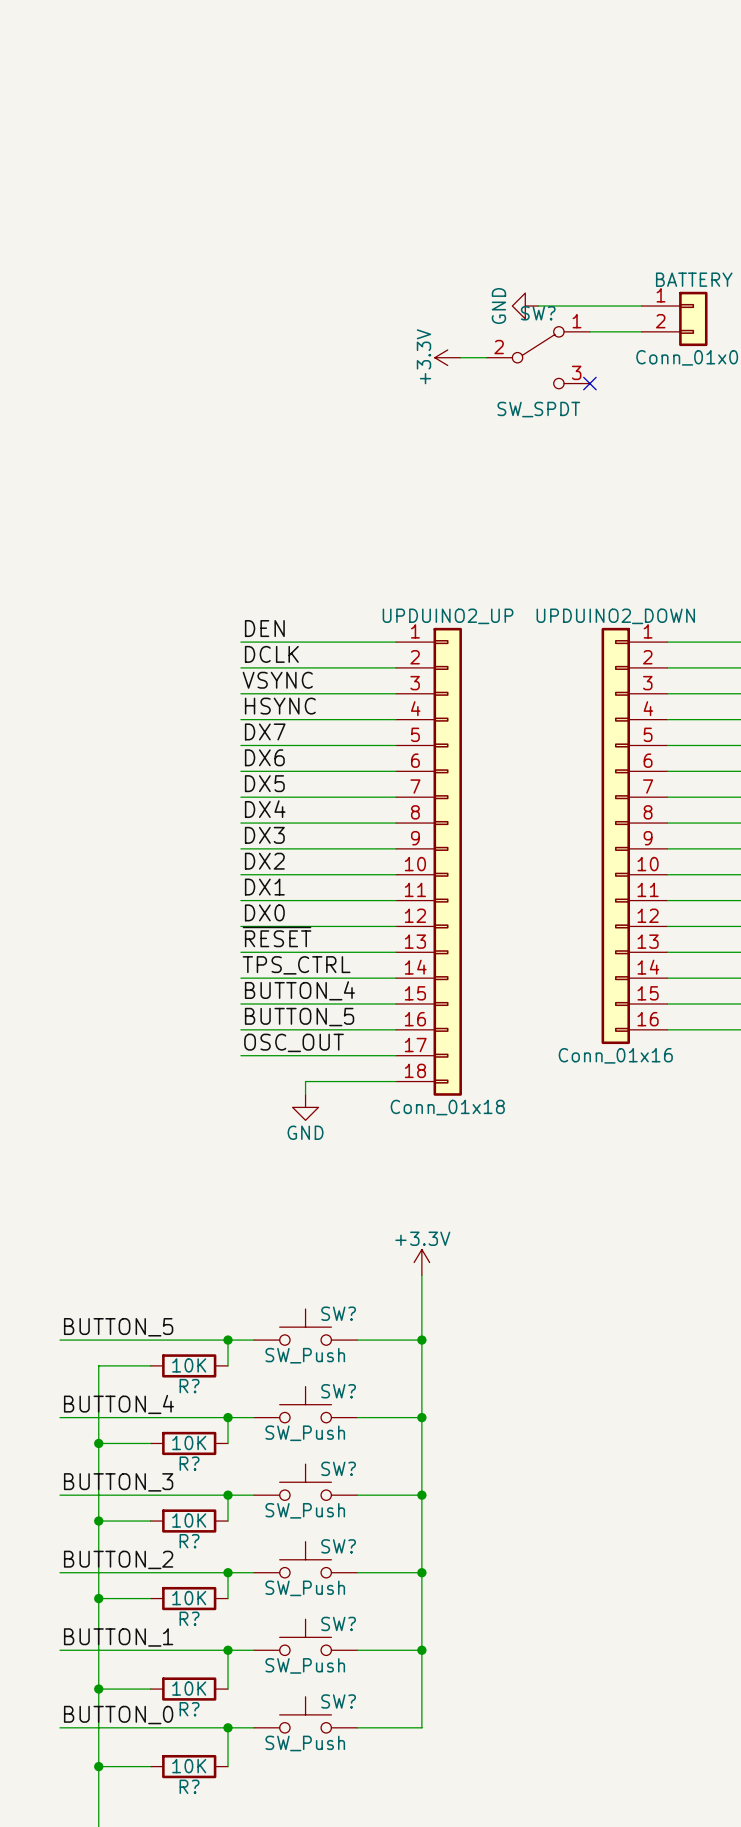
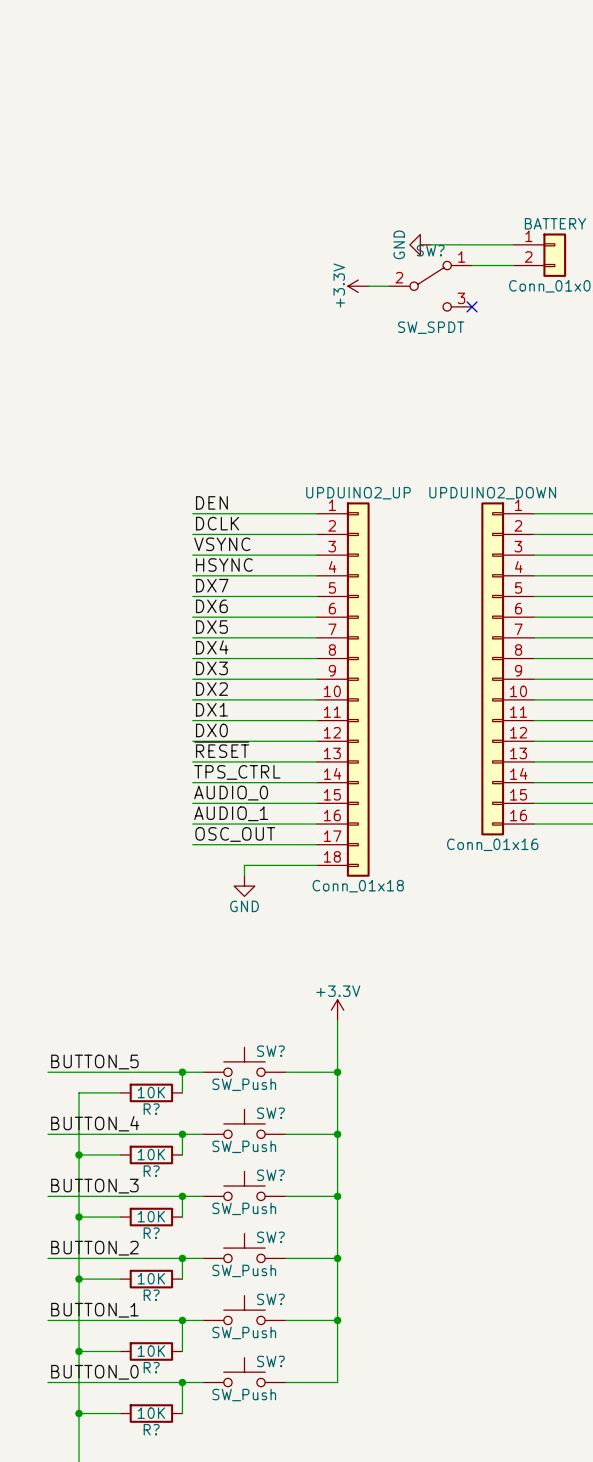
label: BUTTON_4 (299, 990) -> AUDIO_0 (231, 793)
label: BUTTON_5 (299, 1017) -> AUDIO_1 (231, 813)

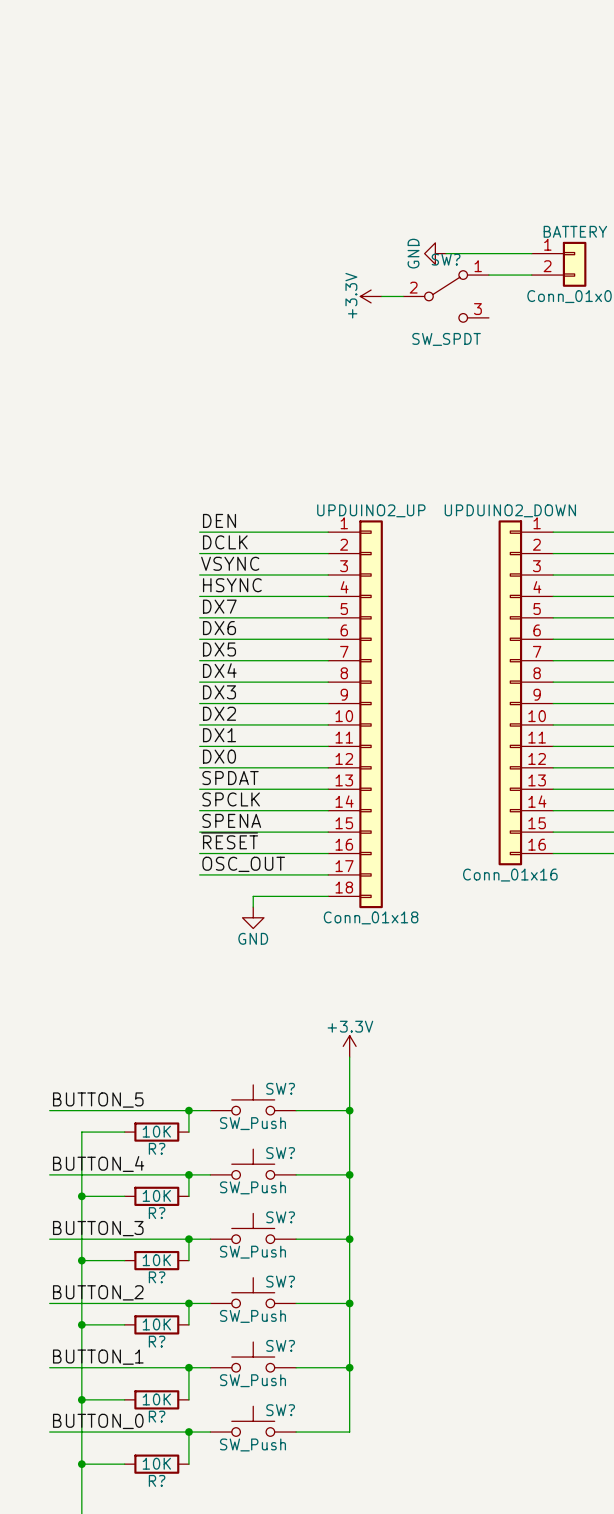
no-connect mark: (472, 306) -> none
label: ~{RESET} (221, 749) -> SPDAT (230, 778)
label: TPS_CTRL (237, 772) -> SPCLK (231, 799)
label: AUDIO_0 (231, 793) -> SPENA (231, 820)
label: AUDIO_1 (231, 813) -> ~{RESET} (229, 840)

